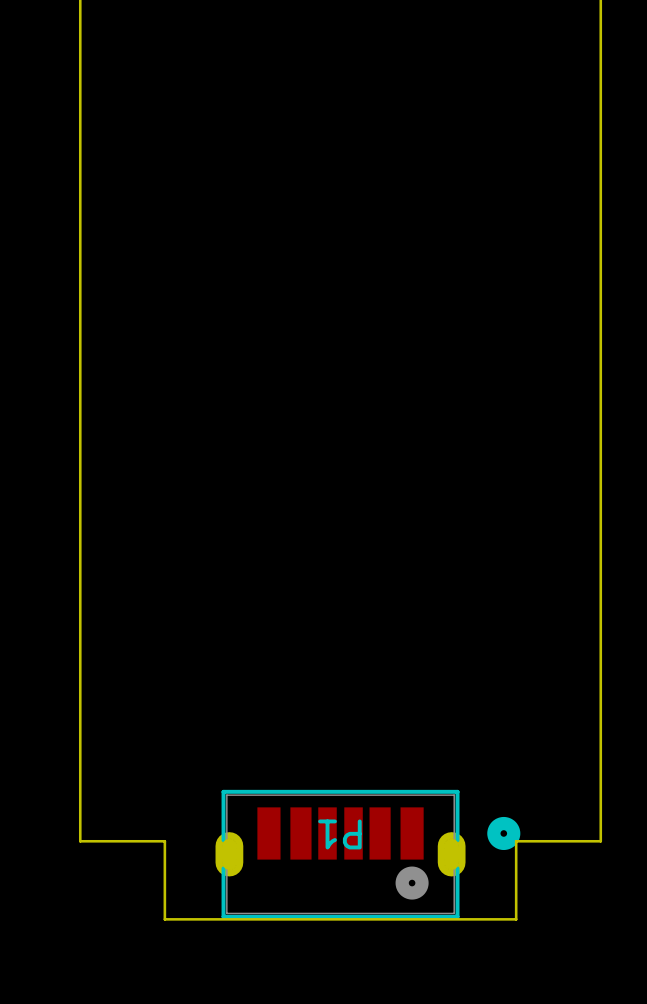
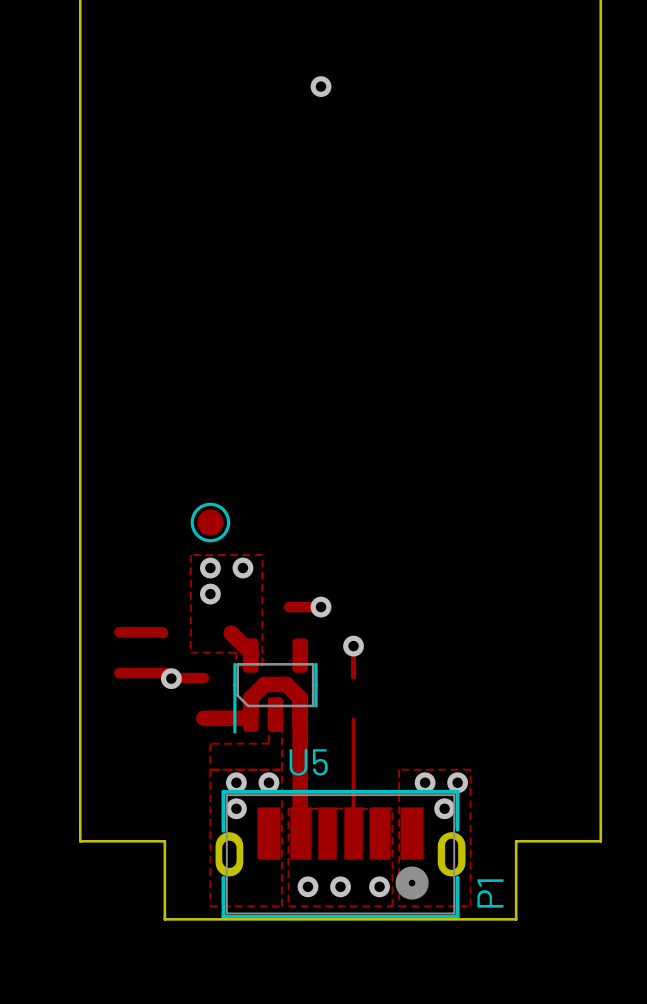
via: none -> (321, 86)
part: none -> (210, 522)
zone outline: none -> (190, 555) (262, 555) (262, 665) (236, 665) (236, 652) (190, 652) (190, 555)
via: none -> (210, 568)
via: none -> (242, 568)
via: none -> (210, 594)
track: none -> (289, 607) (321, 607)
via: none -> (321, 607)
track: none -> (119, 632) (162, 633)
track: none -> (231, 633) (250, 652) (250, 655)
track: none -> (353, 646) (353, 676)
via: none -> (353, 646)
track: none -> (119, 673) (165, 673) (171, 678) (203, 677)
via: none -> (171, 678)
U5: none -> (275, 685)
zone outline: none -> (268, 698) (281, 698) (281, 906) (210, 906) (210, 743) (268, 743) (268, 698)
track: none -> (203, 718) (247, 718) (250, 714) (250, 698) (264, 684) (286, 684) (300, 698) (300, 833)
track: none -> (353, 719) (353, 833)
zone outline: none -> (210, 769) (281, 769)
zone outline: none -> (399, 769) (470, 769) (470, 906) (399, 906) (399, 769)
via: none -> (236, 782)
via: none -> (268, 782)
via: none -> (425, 782)
via: none -> (457, 782)
P1 footprint: [215, 789, 521, 919] -> [215, 789, 466, 919]
via: none -> (236, 808)
zone outline: none -> (288, 808) (288, 906) (392, 906) (392, 808) (288, 808)
via: none -> (444, 808)
P1 name position: P1 (339, 834) -> P1 (490, 893)
via: none -> (307, 886)
via: none -> (340, 886)
via: none -> (379, 886)

